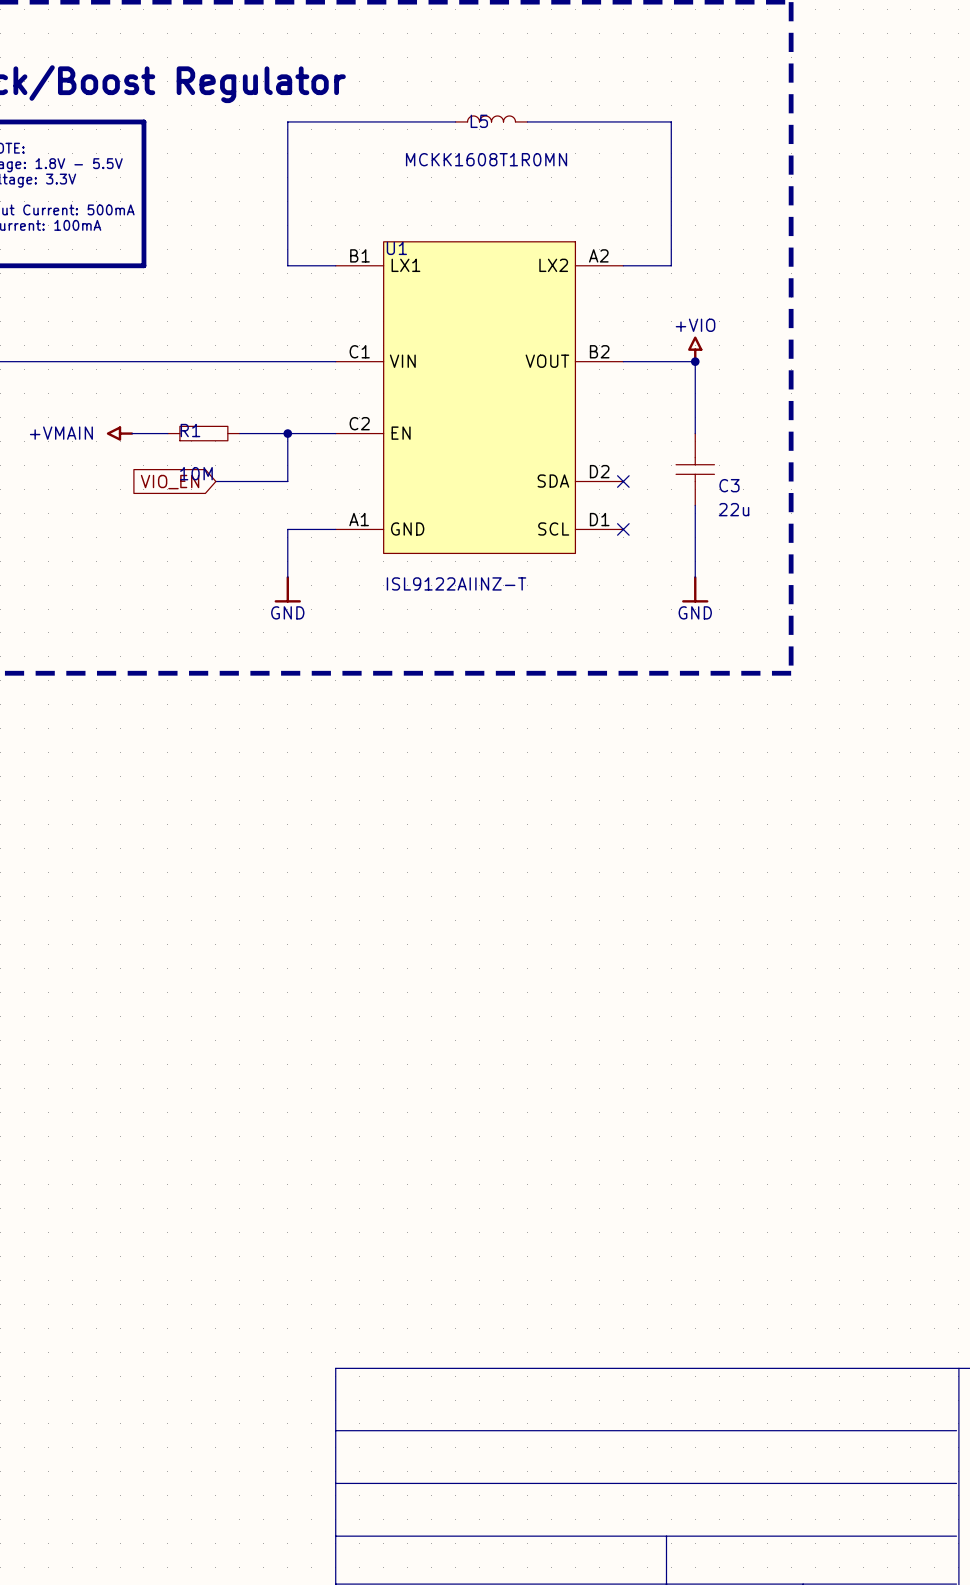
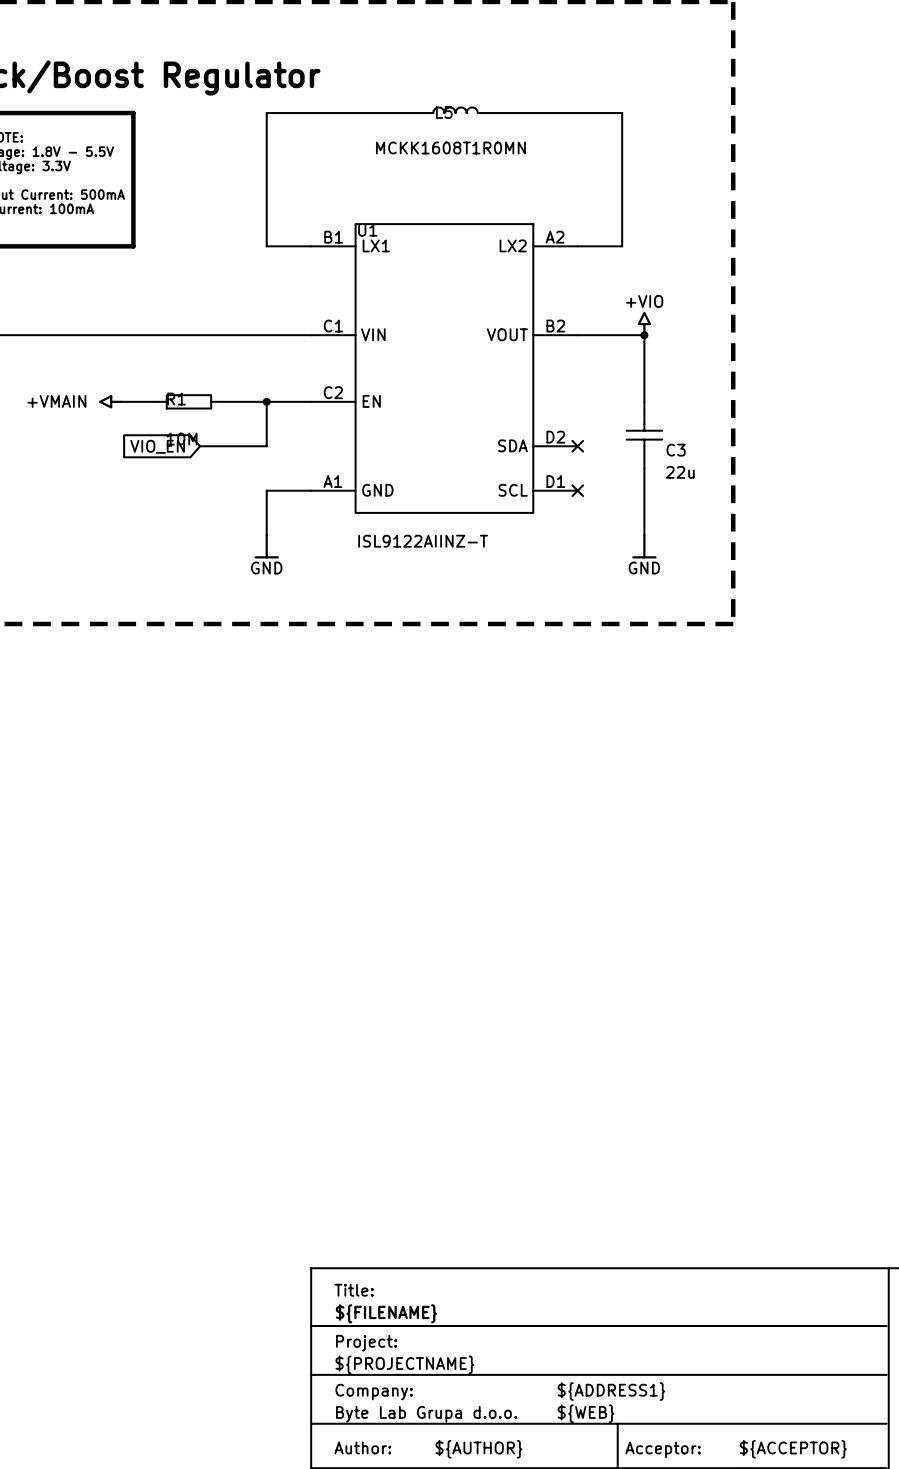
text: none -> Title: (354, 1290)
text: none -> ${FILENAME} (386, 1313)
text: none -> Project: (366, 1343)
text: none -> ${PROJECTNAME} (404, 1364)
text: none -> Company: (374, 1392)
text: none -> ${ADDRESS1} (611, 1391)
text: none -> Byte Lab Grupa d.o.o. (426, 1414)
text: none -> ${WEB} (586, 1413)
text: none -> Author: (362, 1447)
text: none -> ${AUTHOR} (478, 1449)
text: none -> ${ACCEPTOR} (793, 1449)
text: none -> Acceptor: (663, 1449)

